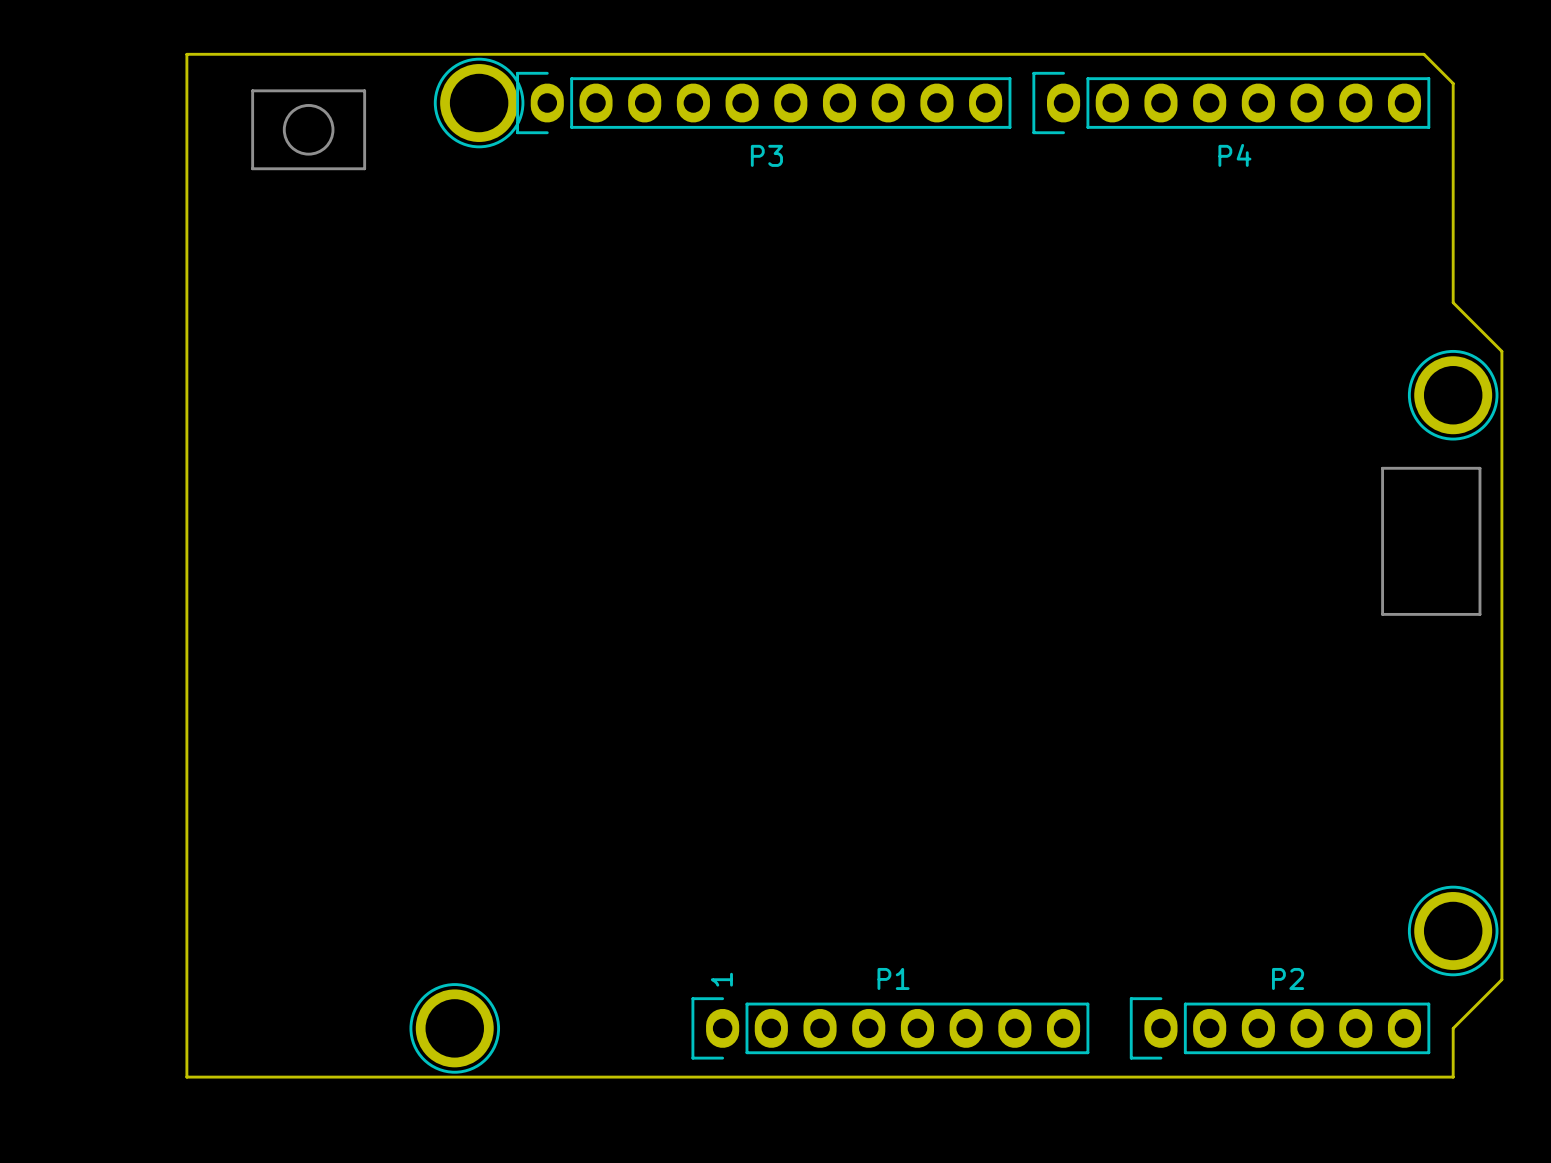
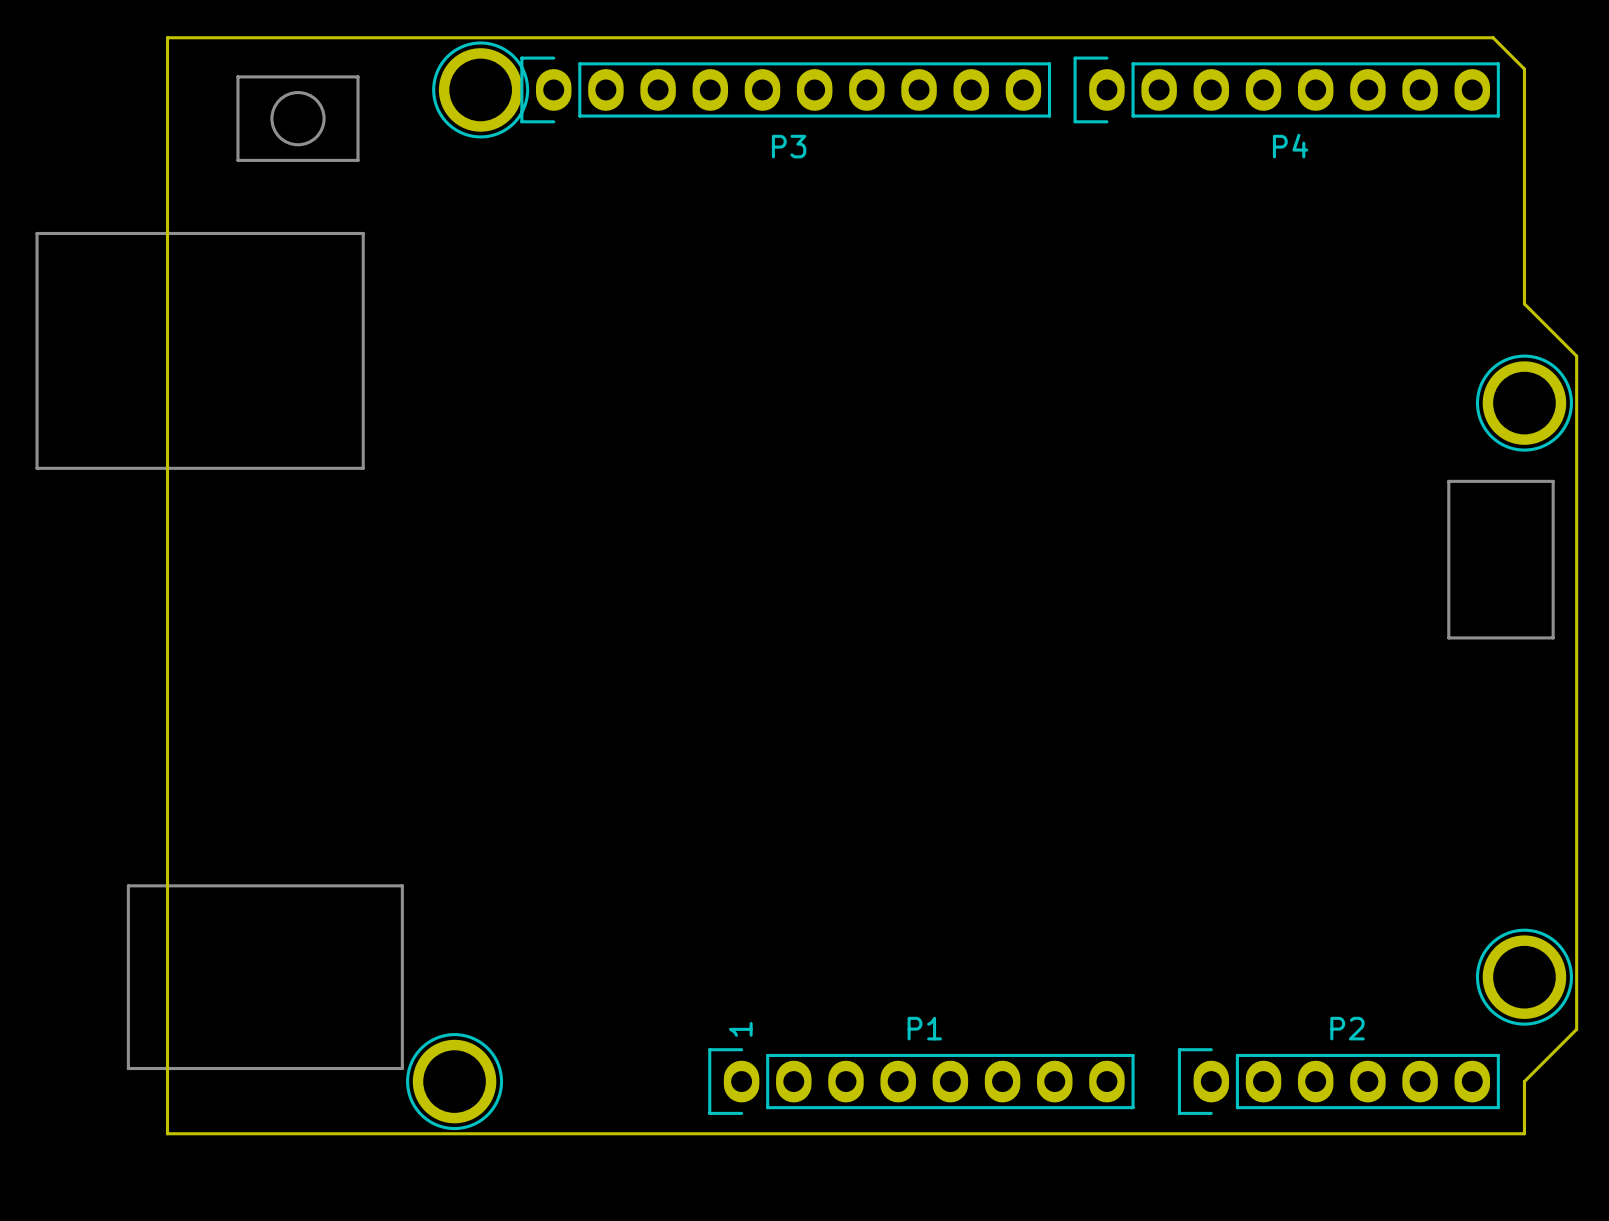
line: none -> (37, 233) (37, 468) (363, 468) (363, 233) (37, 233)
line: none -> (128, 885) (128, 1068) (402, 1068) (402, 885) (128, 885)

